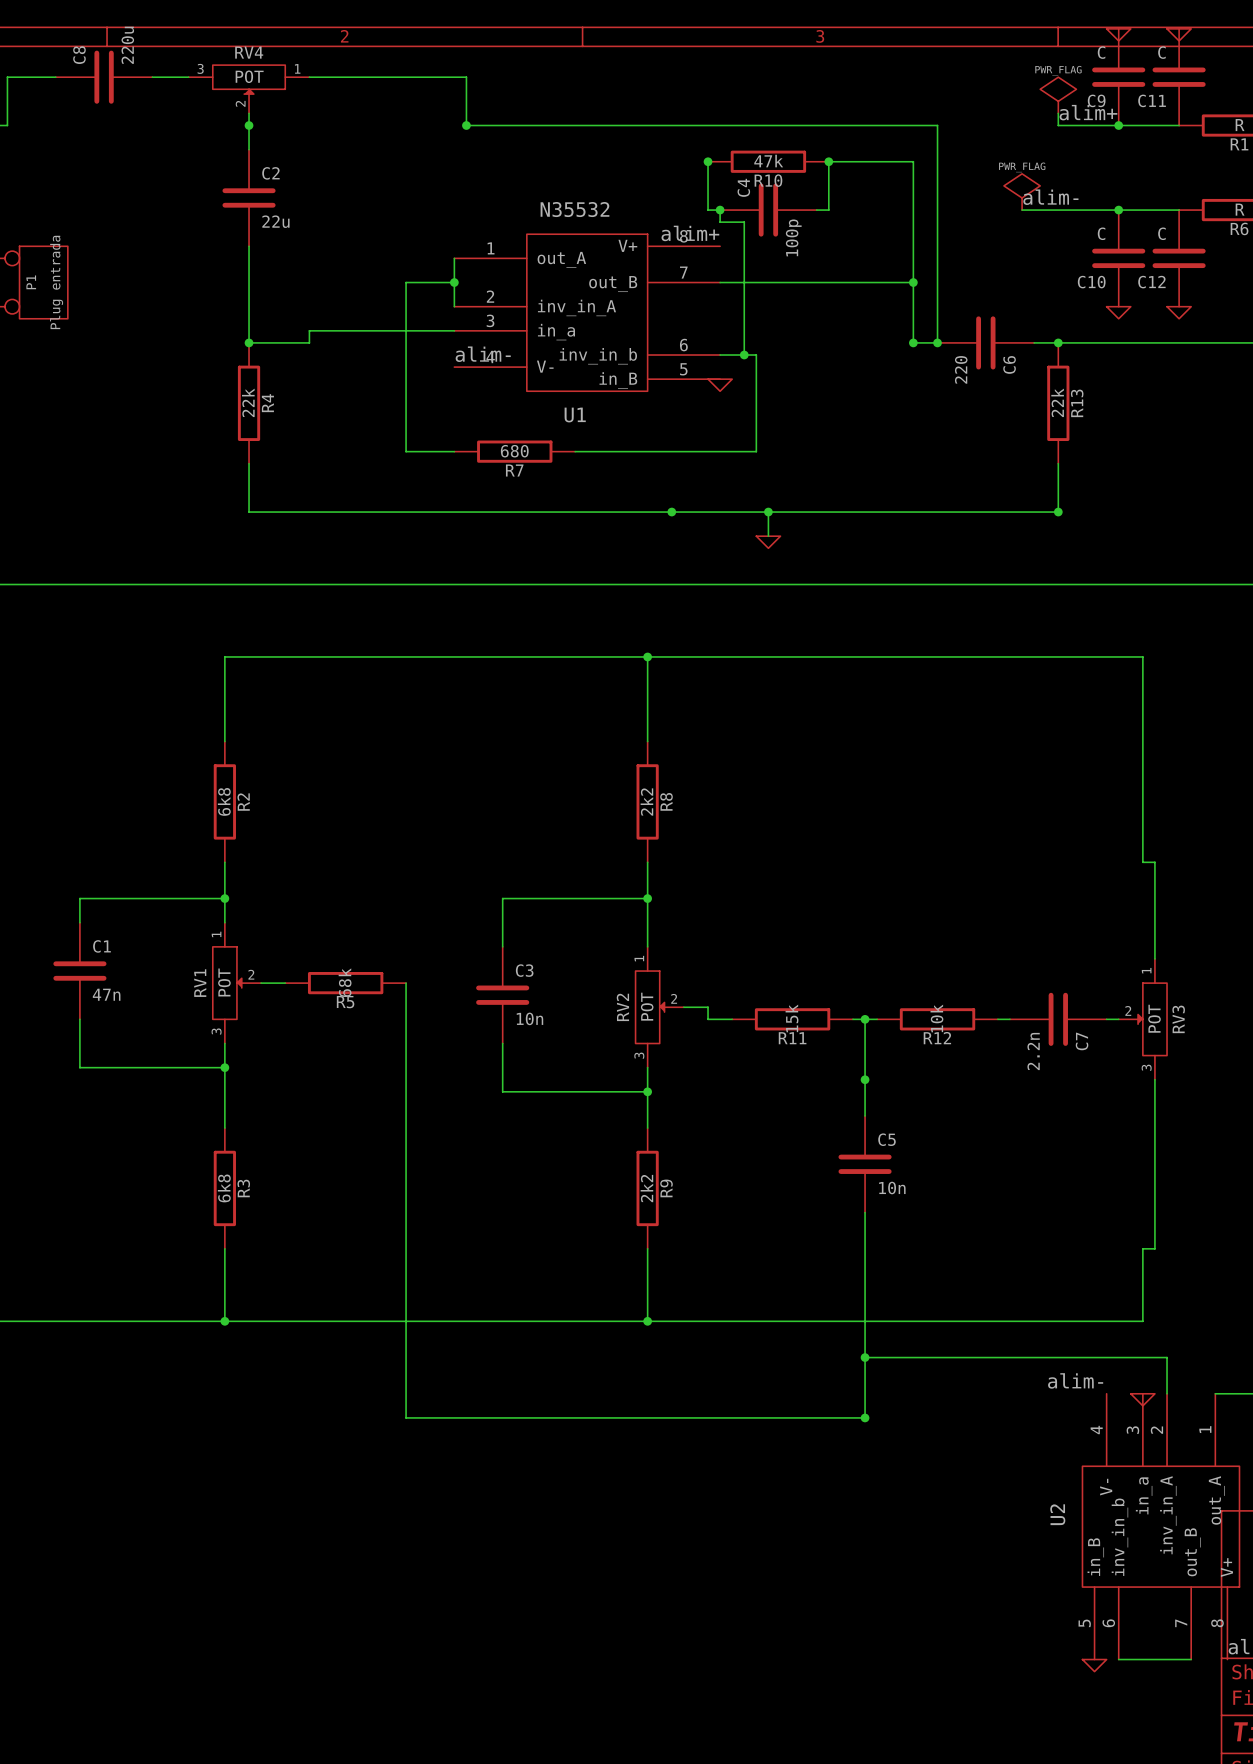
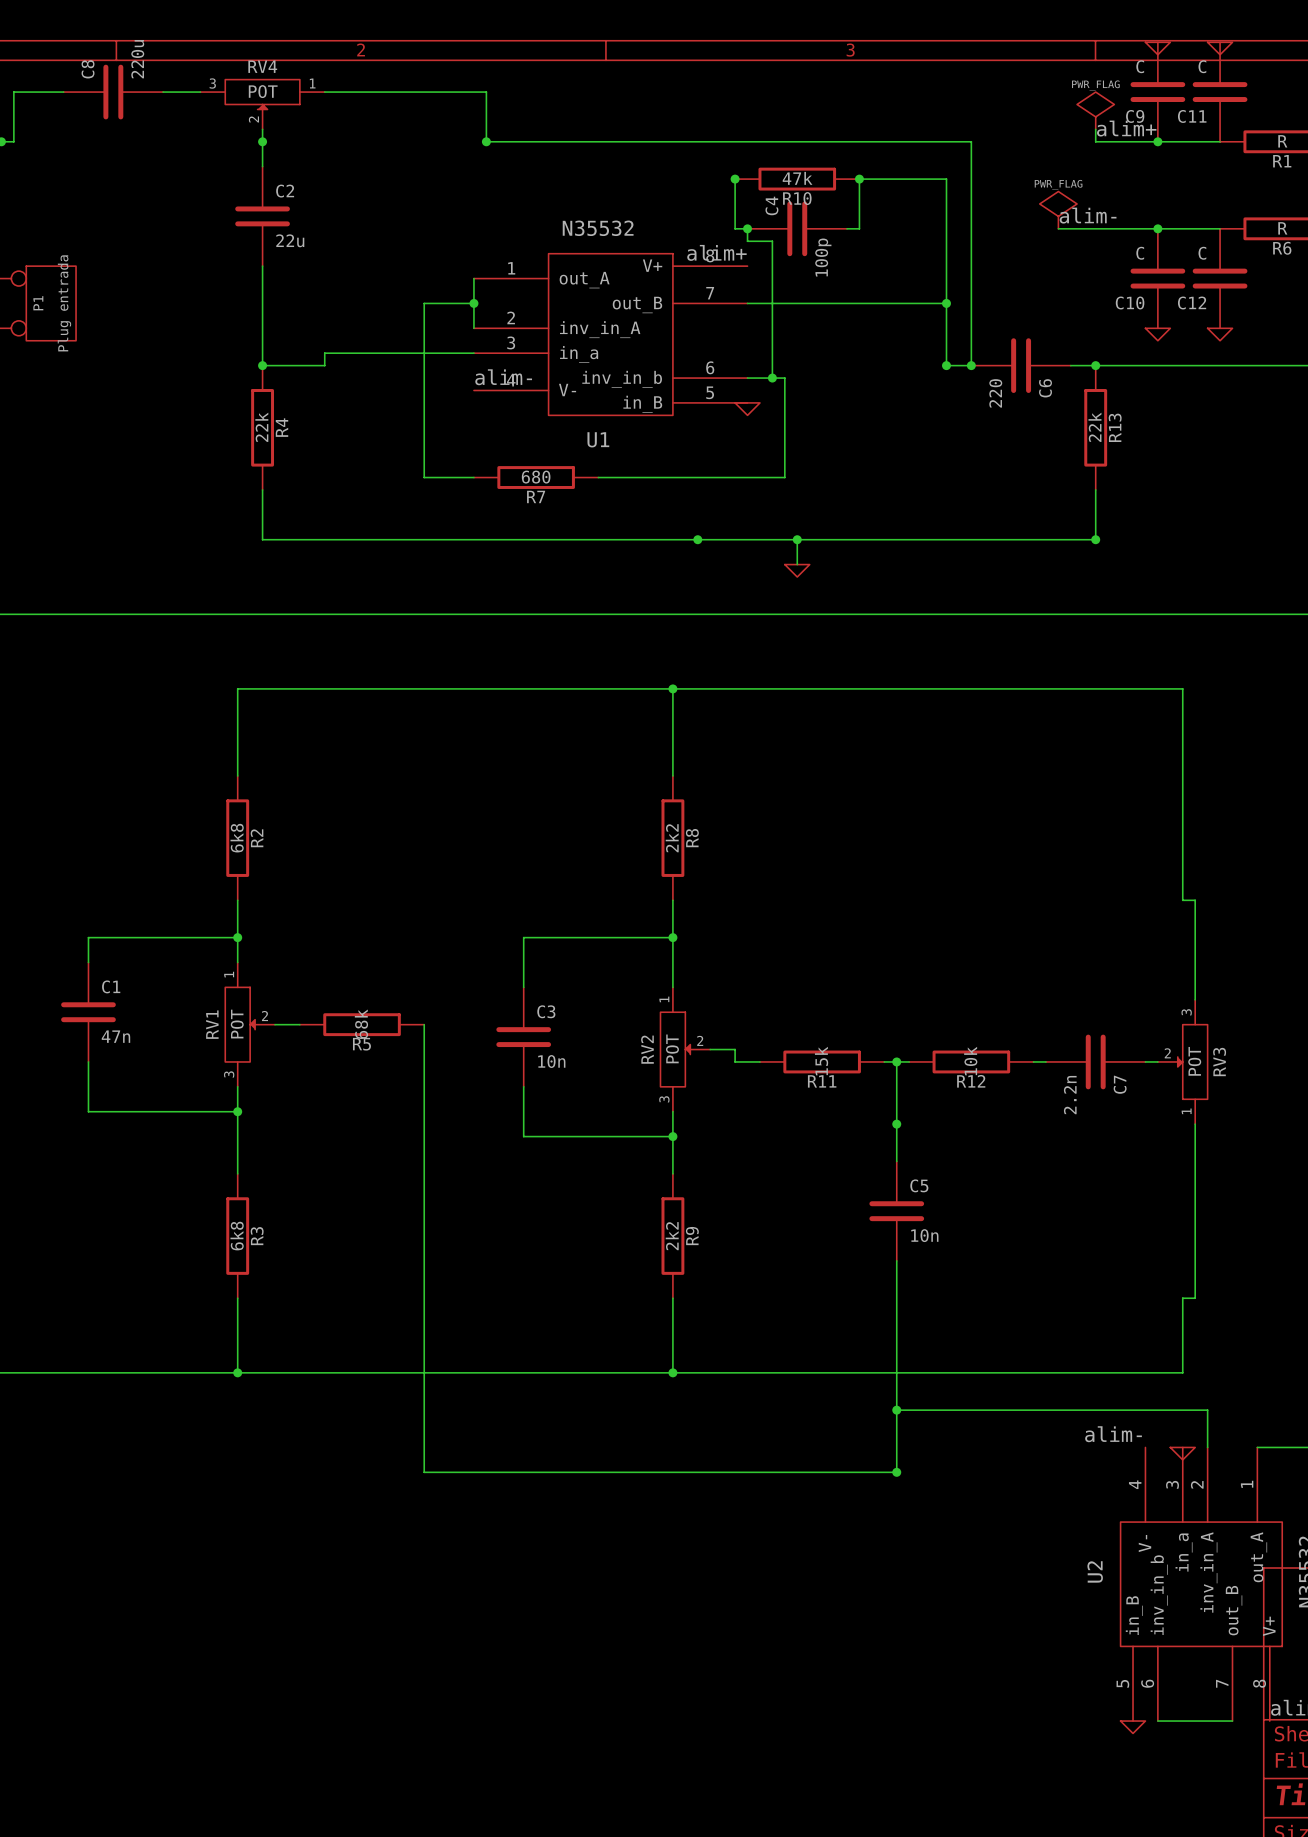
RV3 flip: as is (1152, 1019) -> up-down (1192, 1061)

